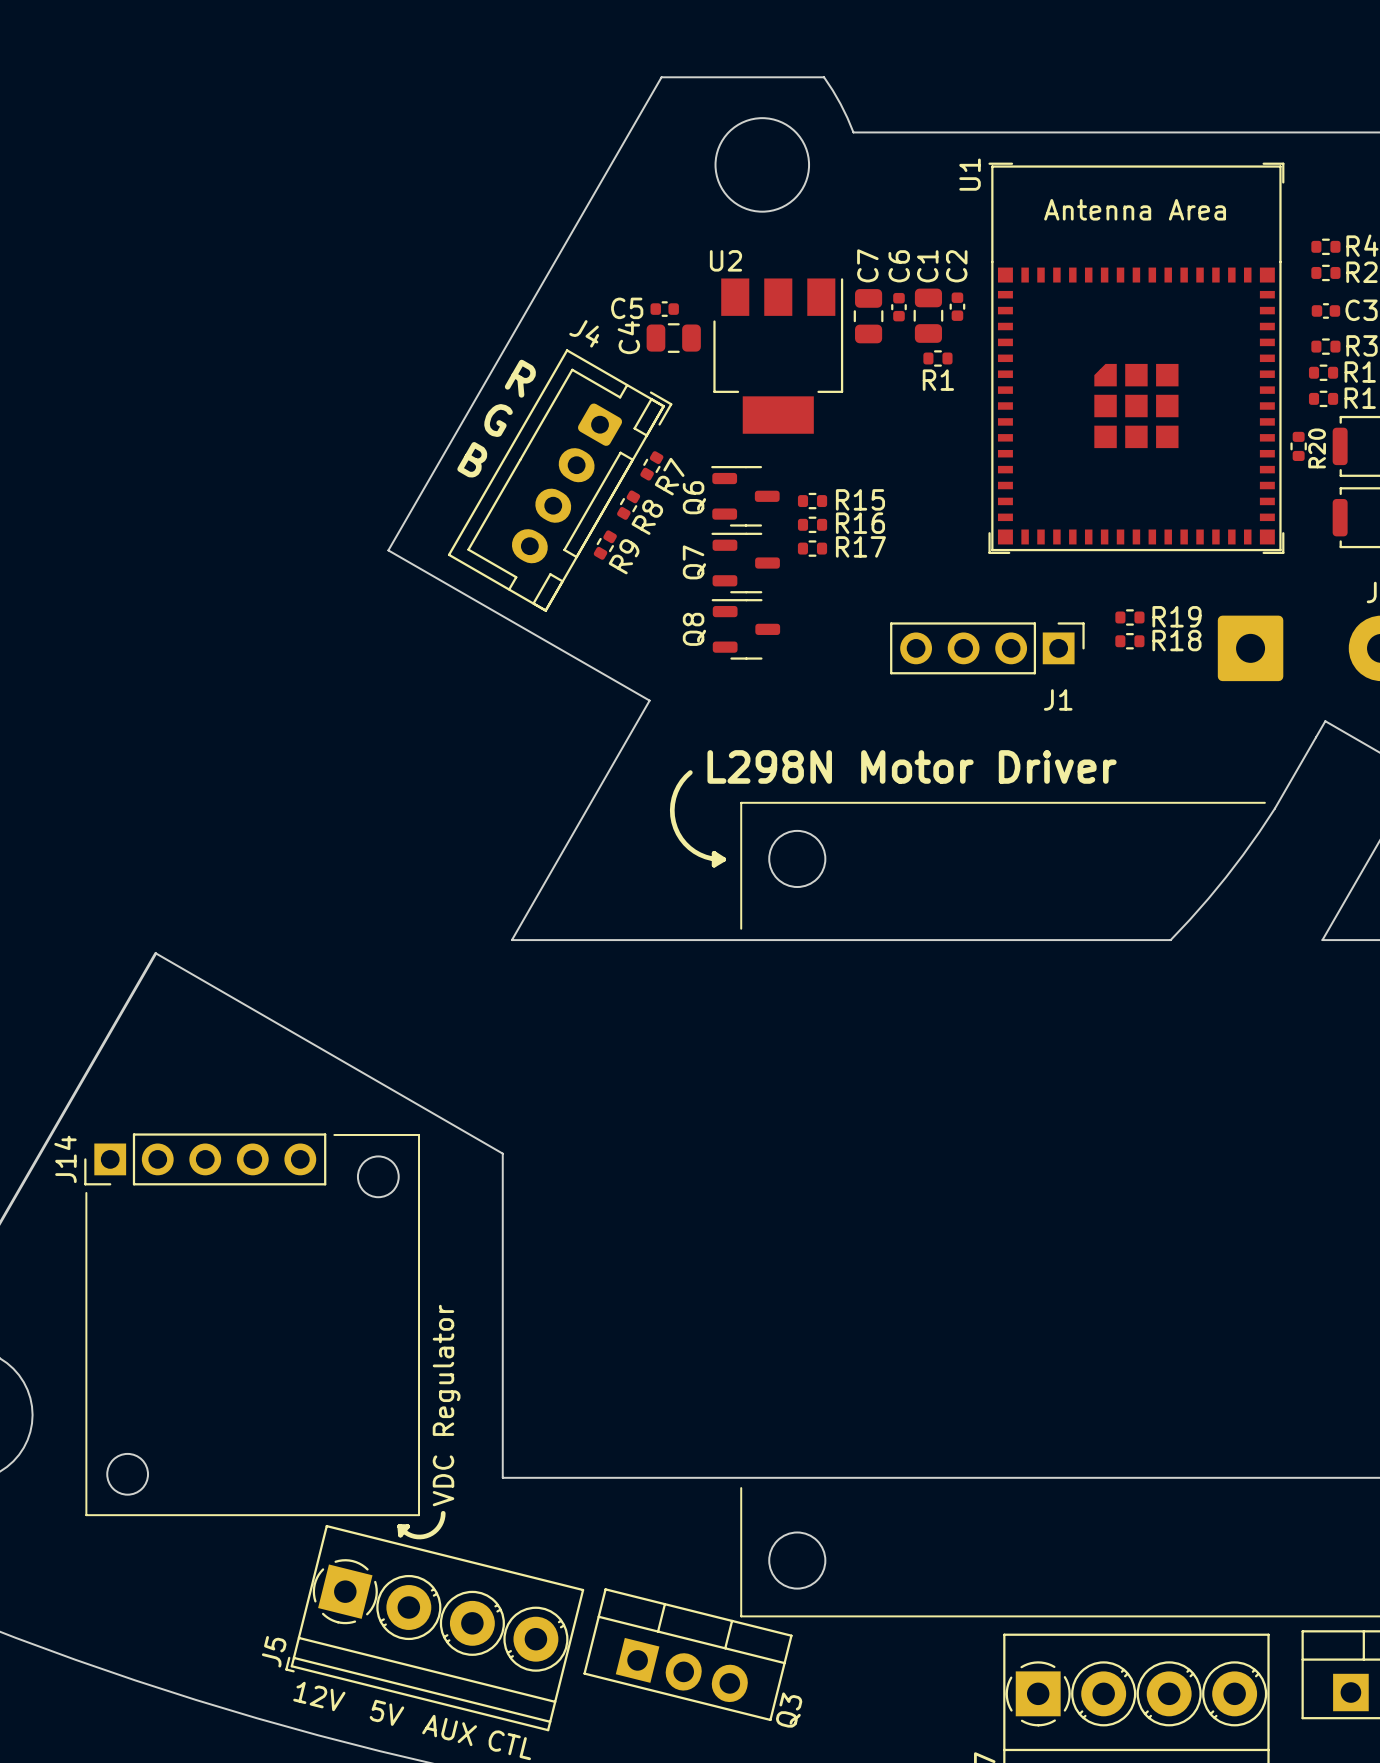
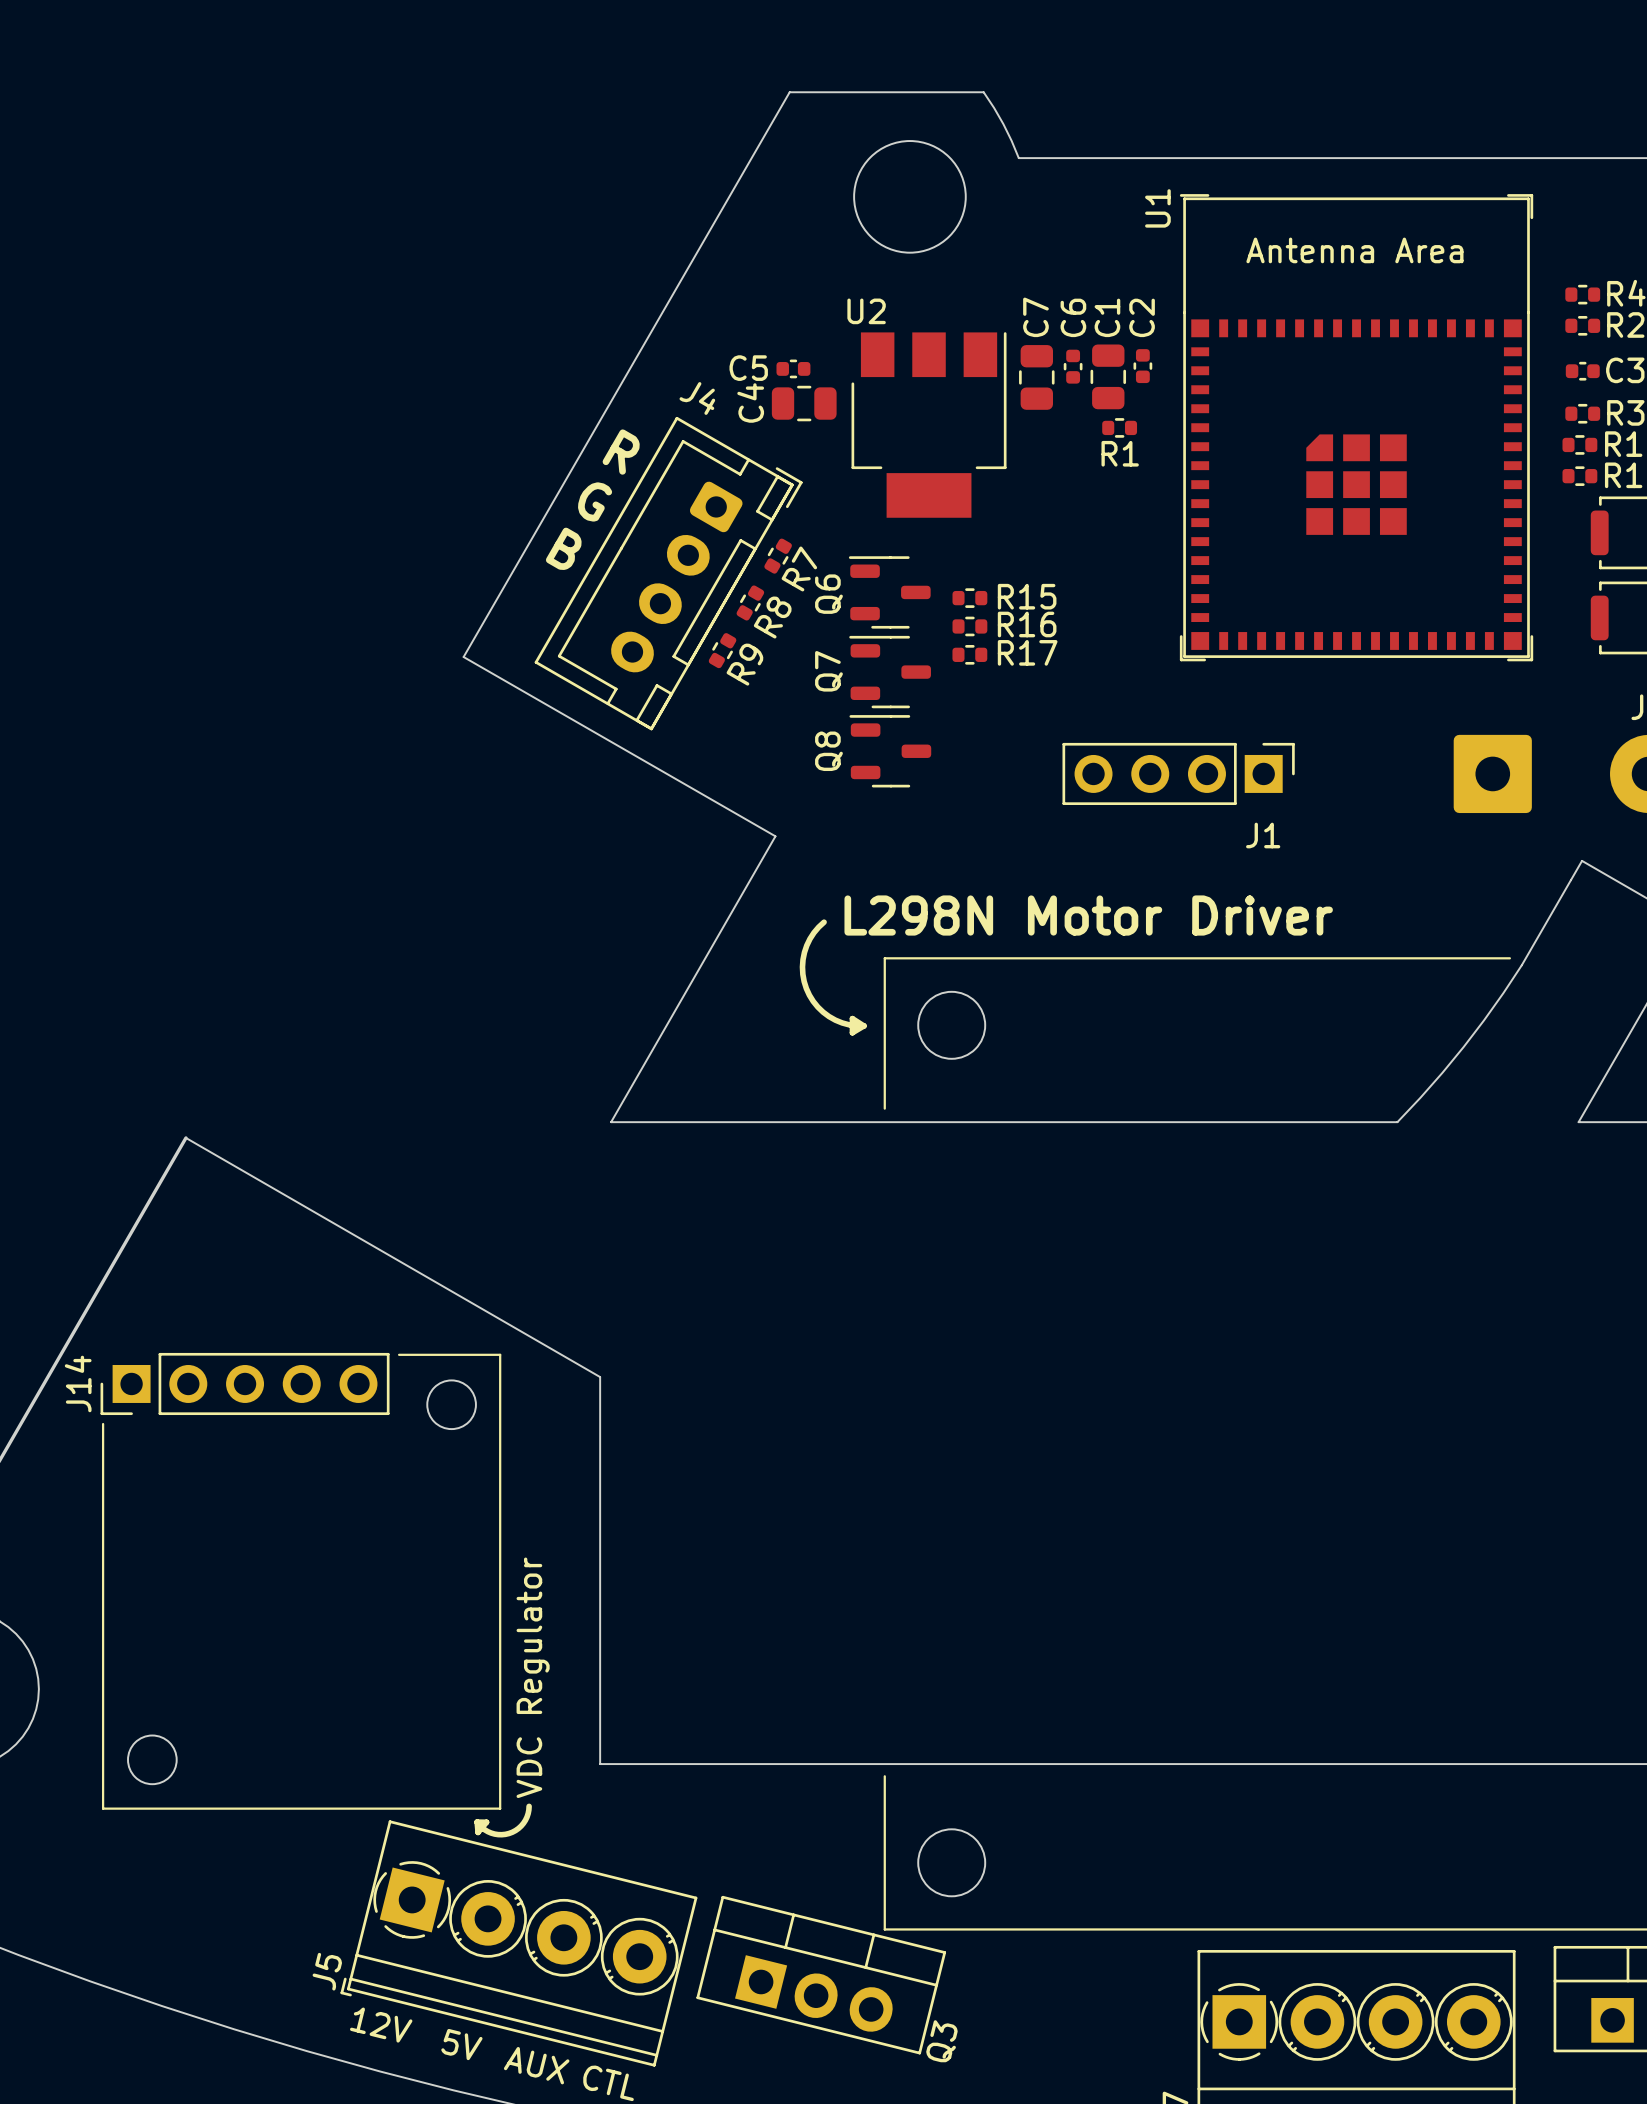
R20: (1298, 446) -> none
R19: (1129, 617) -> none
R18: (1129, 641) -> none

